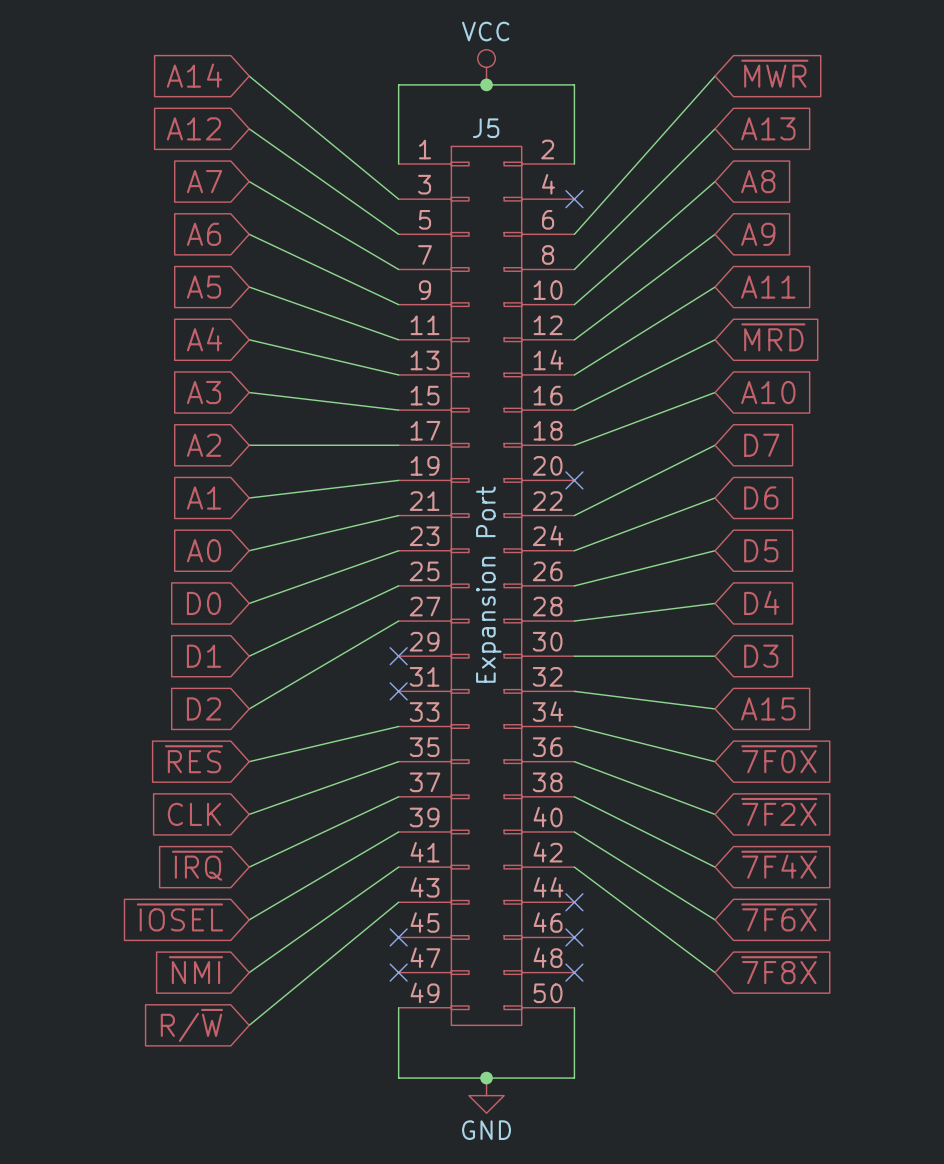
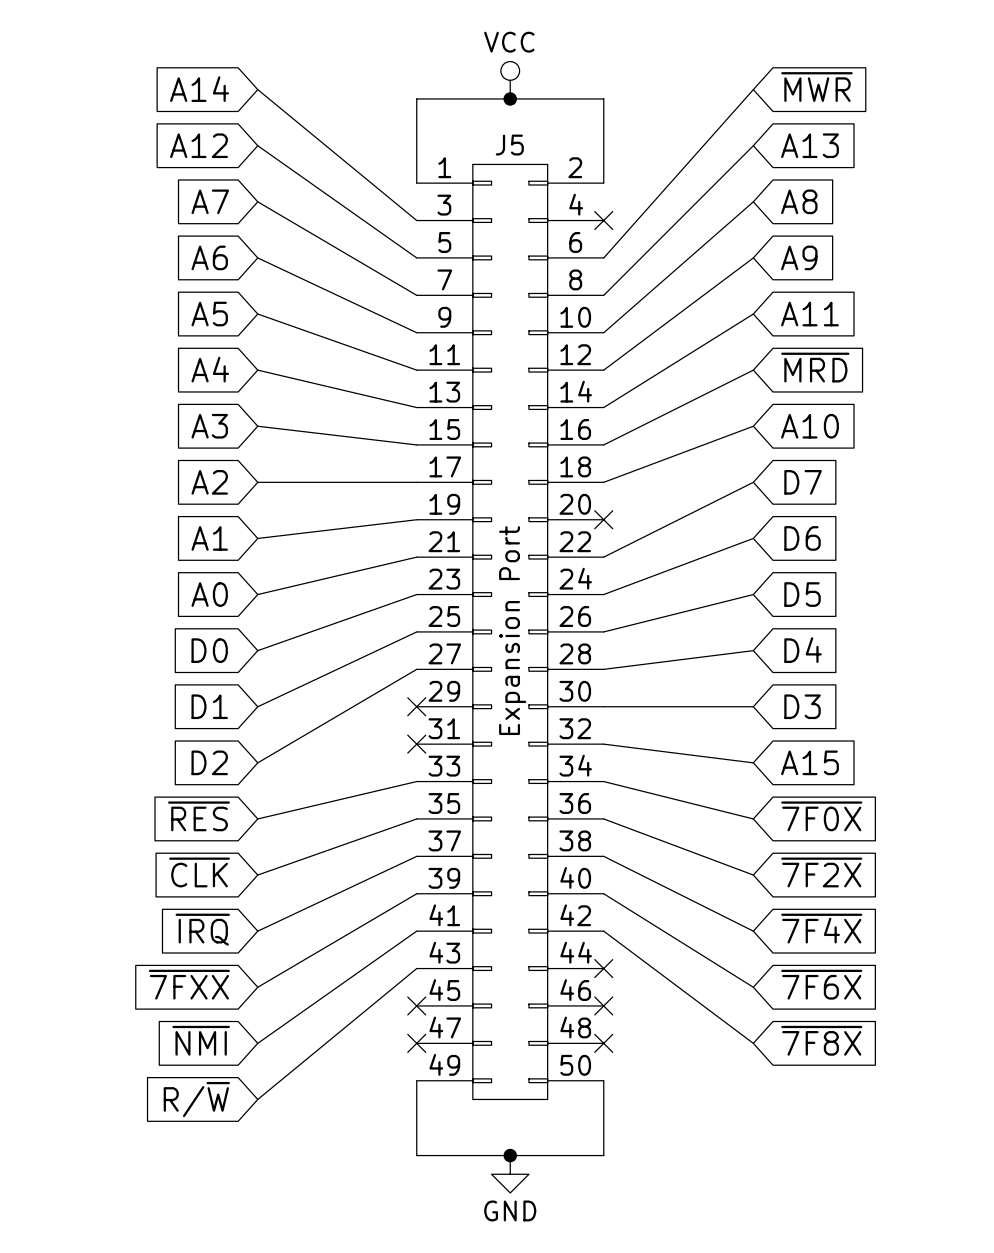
global label: CLK (194, 814) -> ~{CLK} (199, 872)
global label: ~{IOSEL} (179, 917) -> ~{7FXX} (189, 984)

